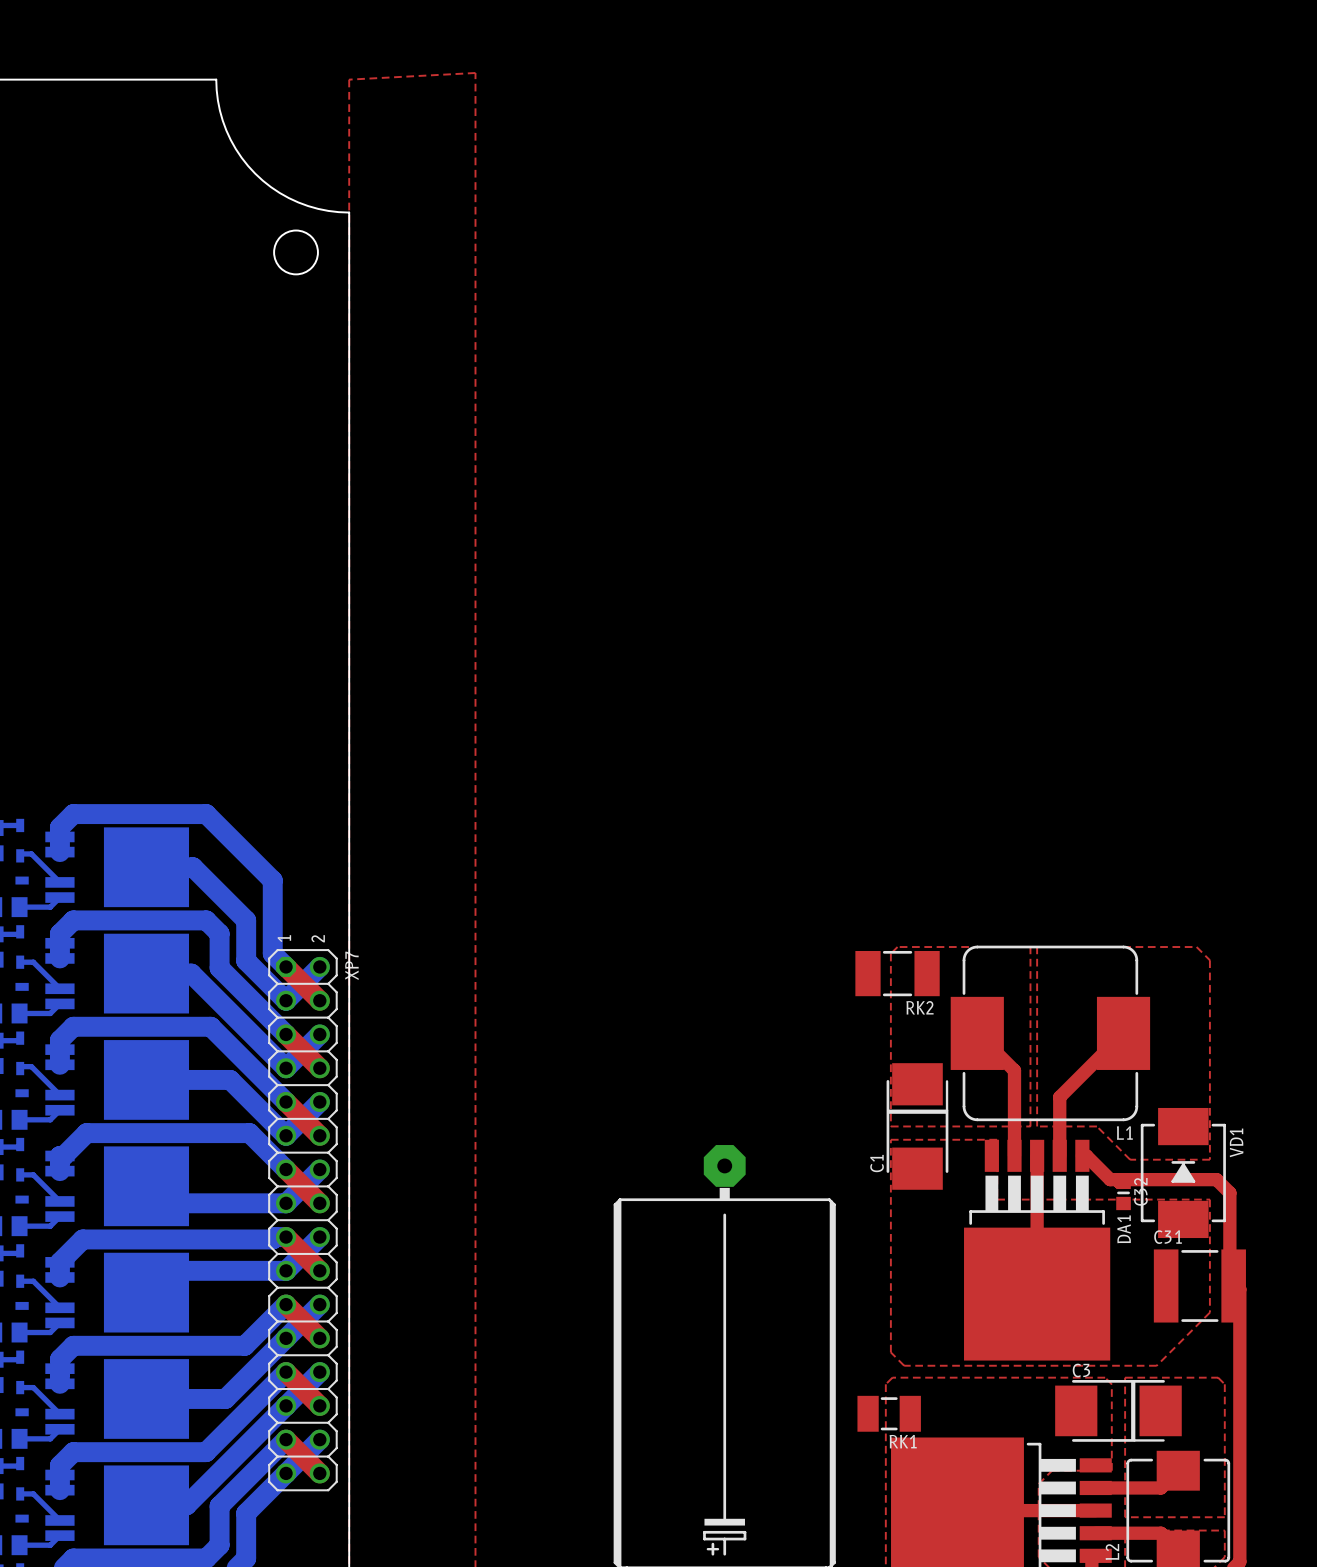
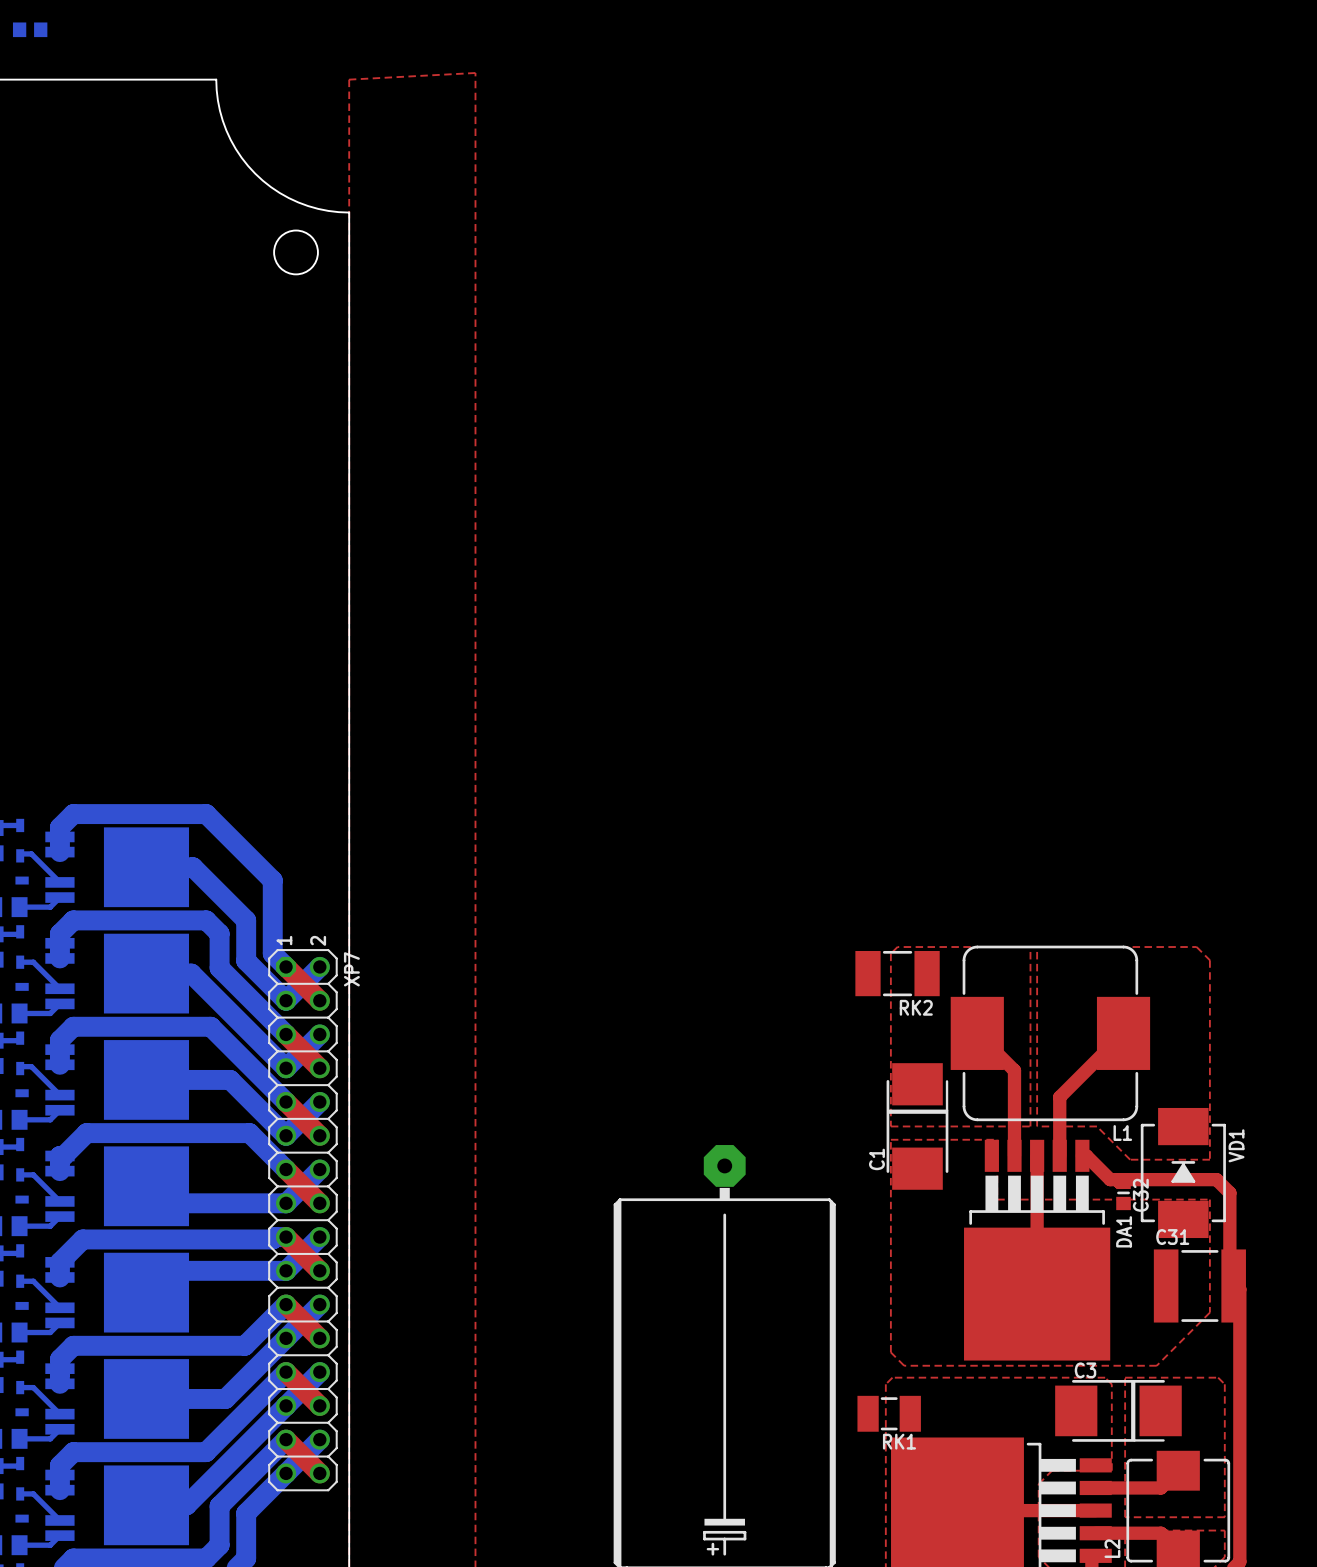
part: none -> (30, 29)

